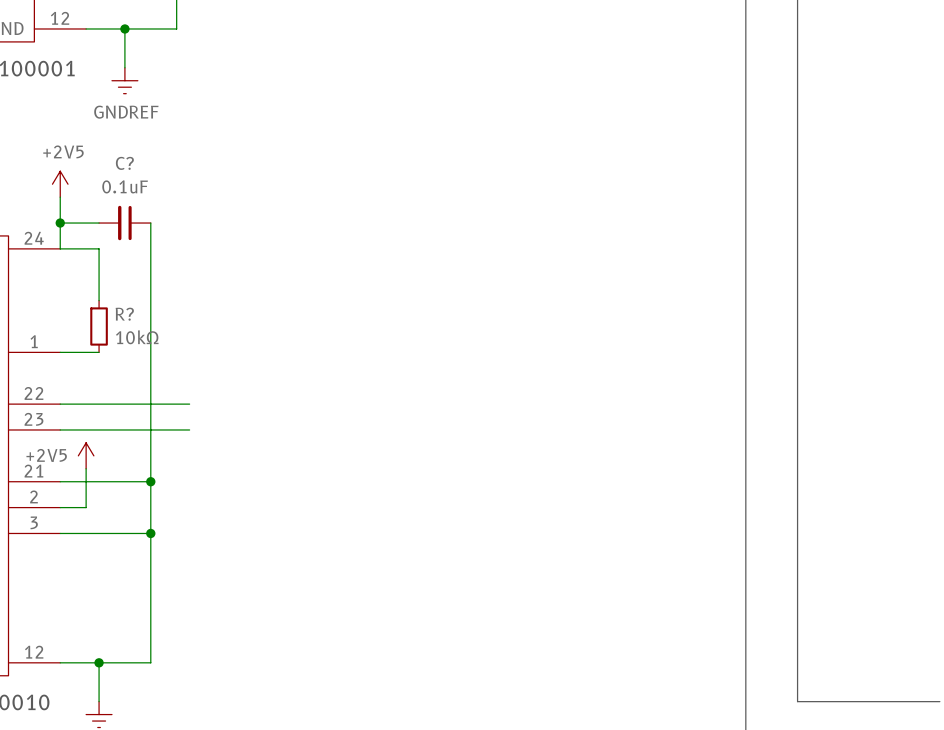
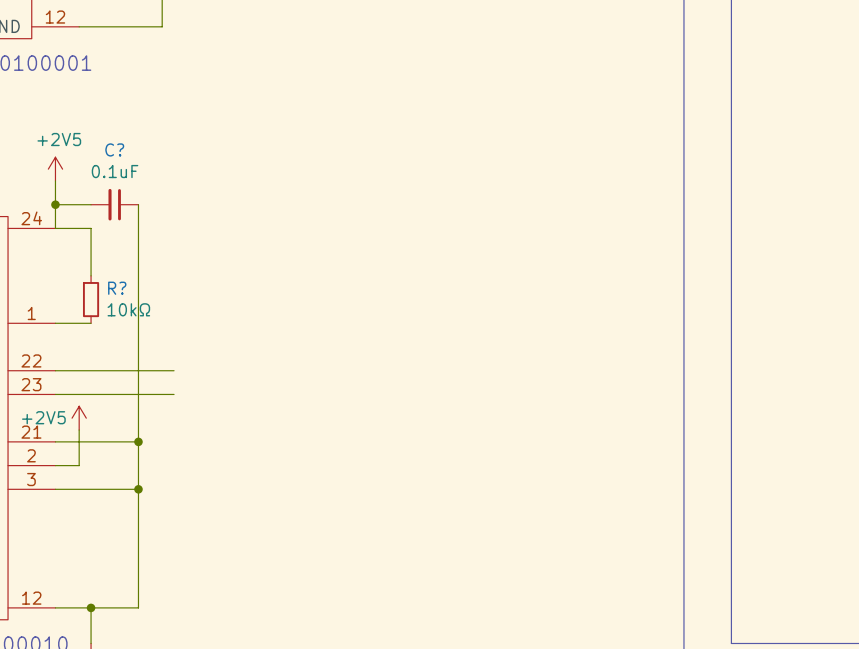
wire: (124, 28) (124, 67) -> none
junction: (124, 28) -> none
power symbol: GNDREF (124, 80) -> none

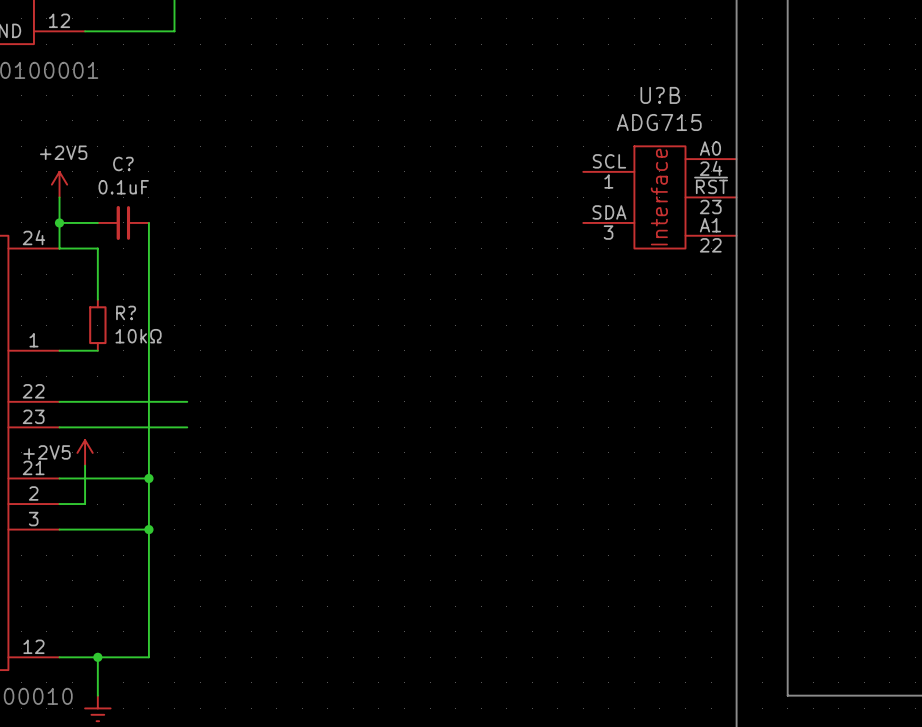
U?B: none -> ADG715 (659, 197)

